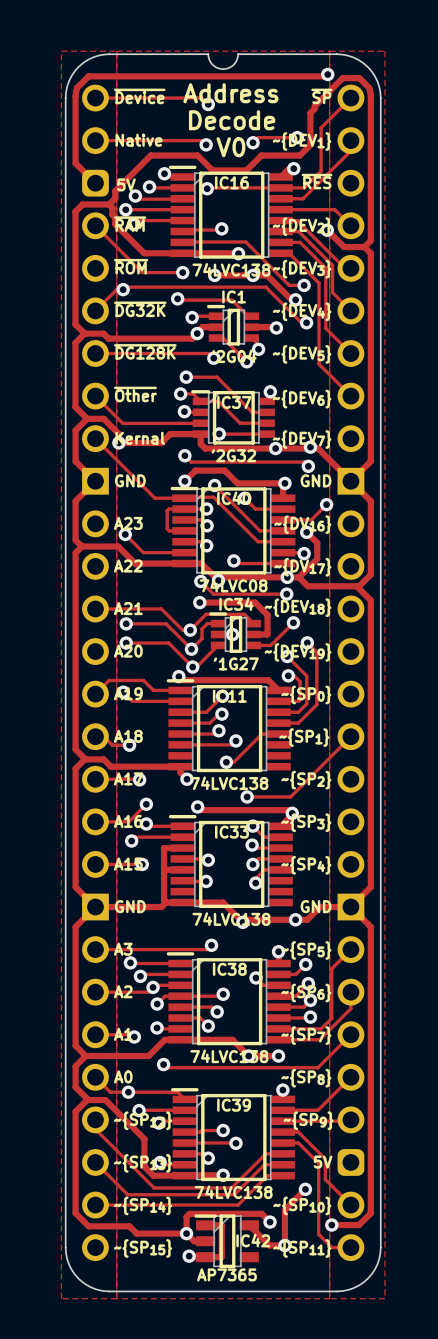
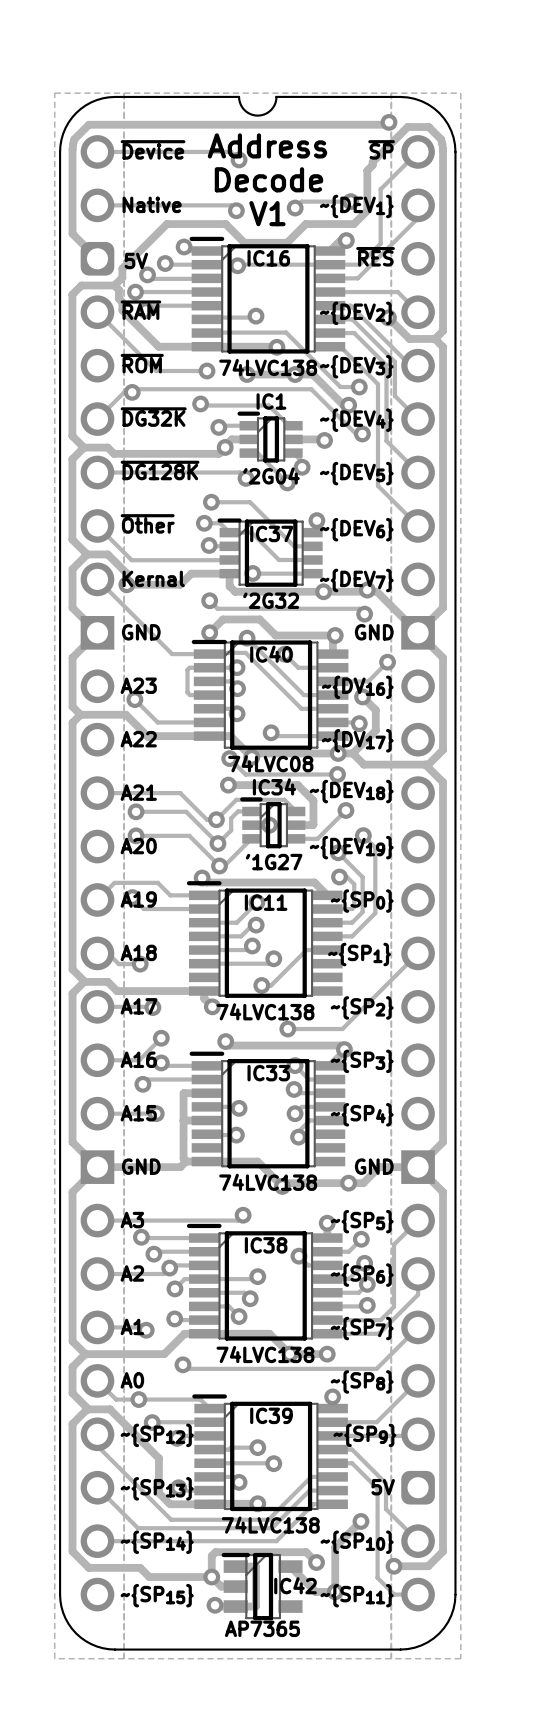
text: V0 (230, 147) -> V1 (267, 213)

